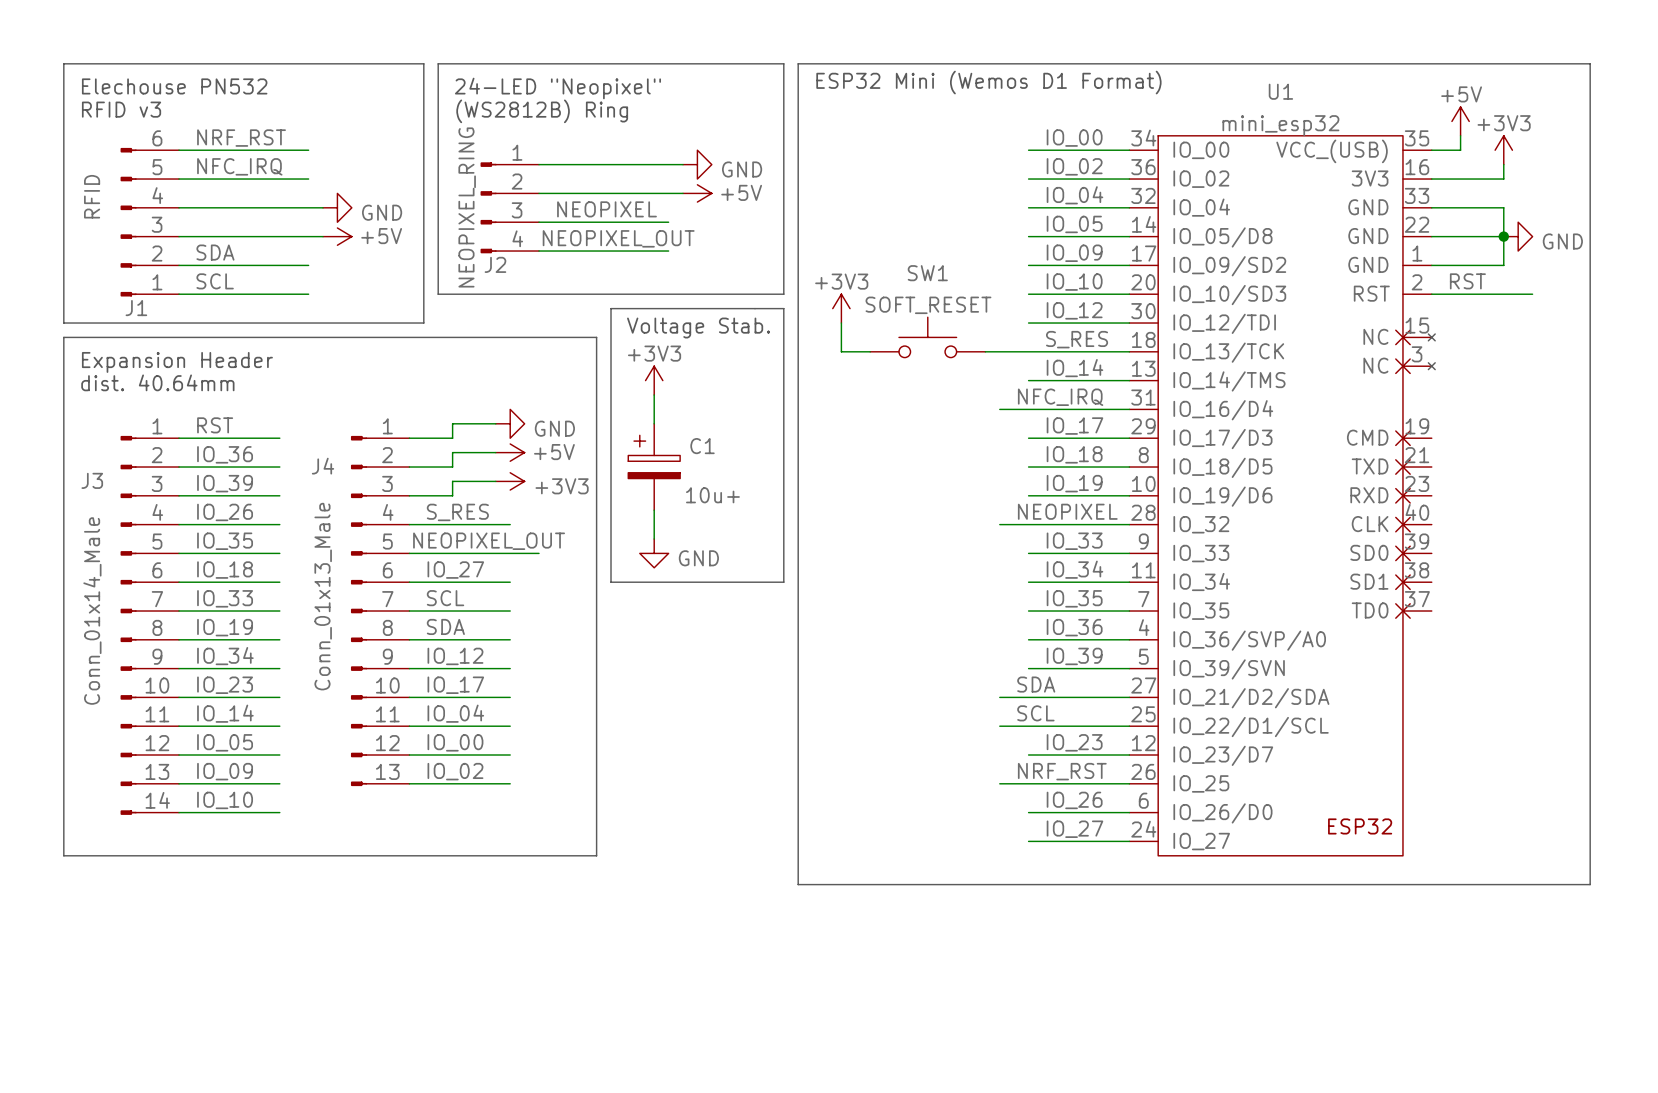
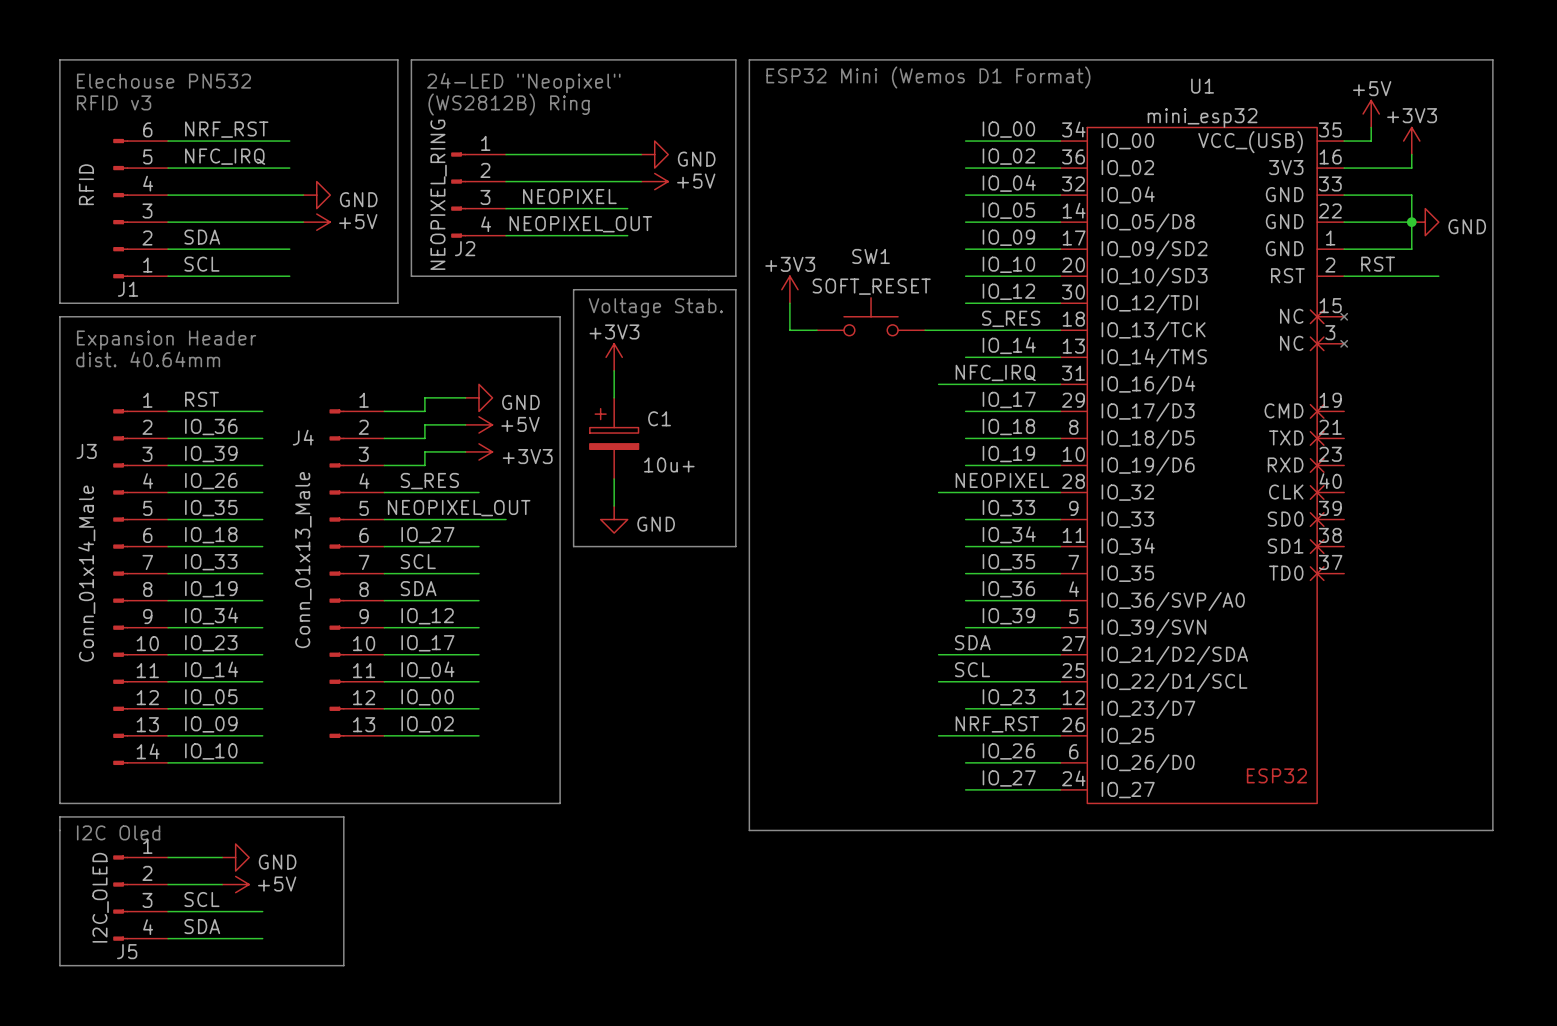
line: none -> (59, 816) (59, 965) (343, 965) (343, 816) (59, 816)
text: none -> I2C Oled (118, 832)
wire: none -> (168, 857) (222, 857)
power symbol: none -> GND (235, 857)
wire: none -> (168, 884) (222, 884)
power symbol: none -> +5V (235, 884)
J5: none -> I2C_OLED (140, 898)
label: none -> SCL (201, 899)
wire: none -> (168, 911) (262, 911)
label: none -> SDA (202, 926)
wire: none -> (168, 938) (262, 938)

